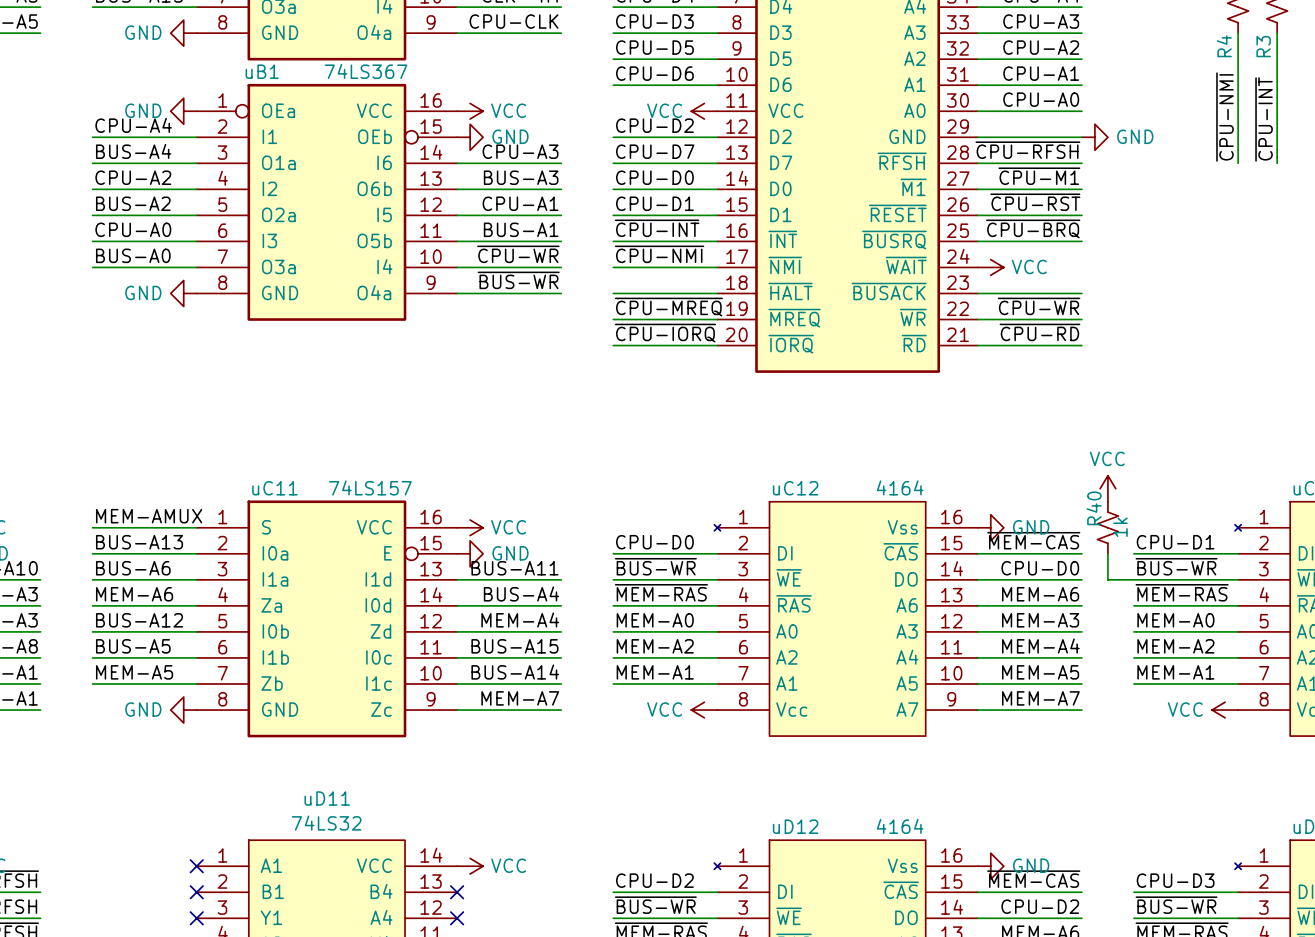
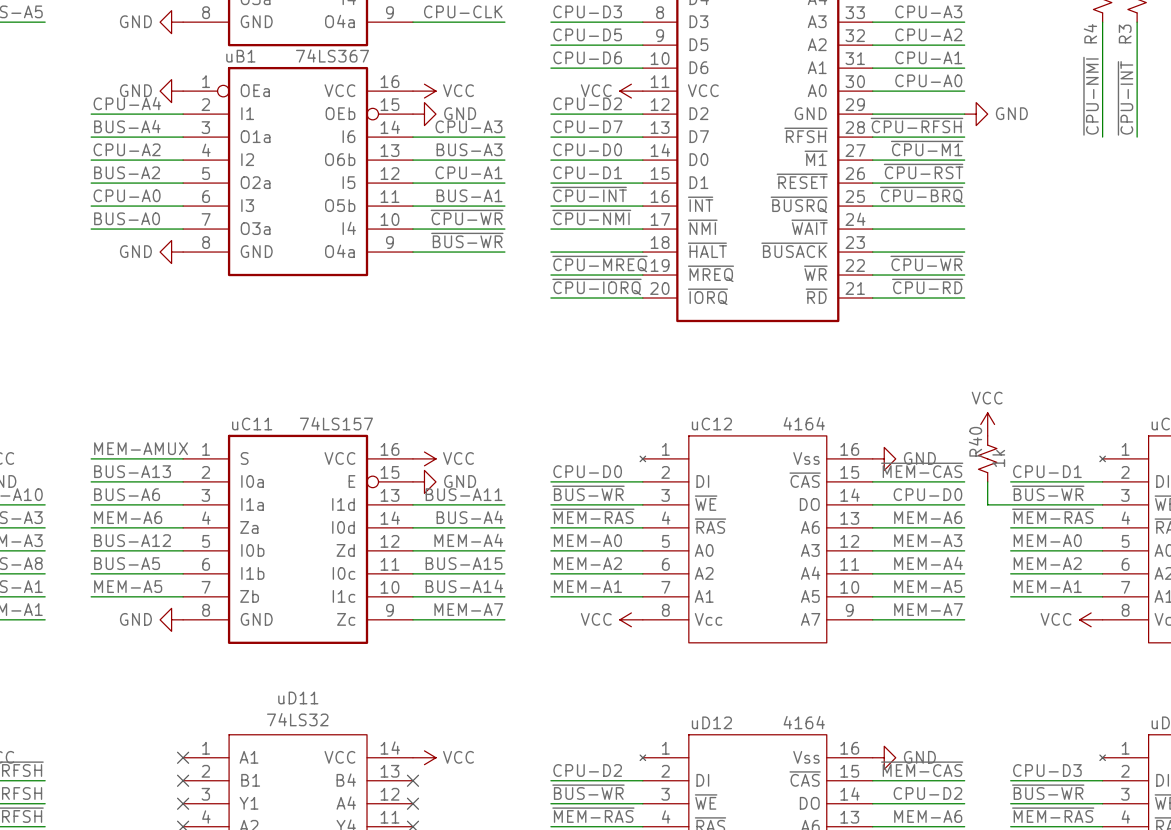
wire: none -> (872, 229) (964, 229)
power symbol: VCC (990, 267) -> none

